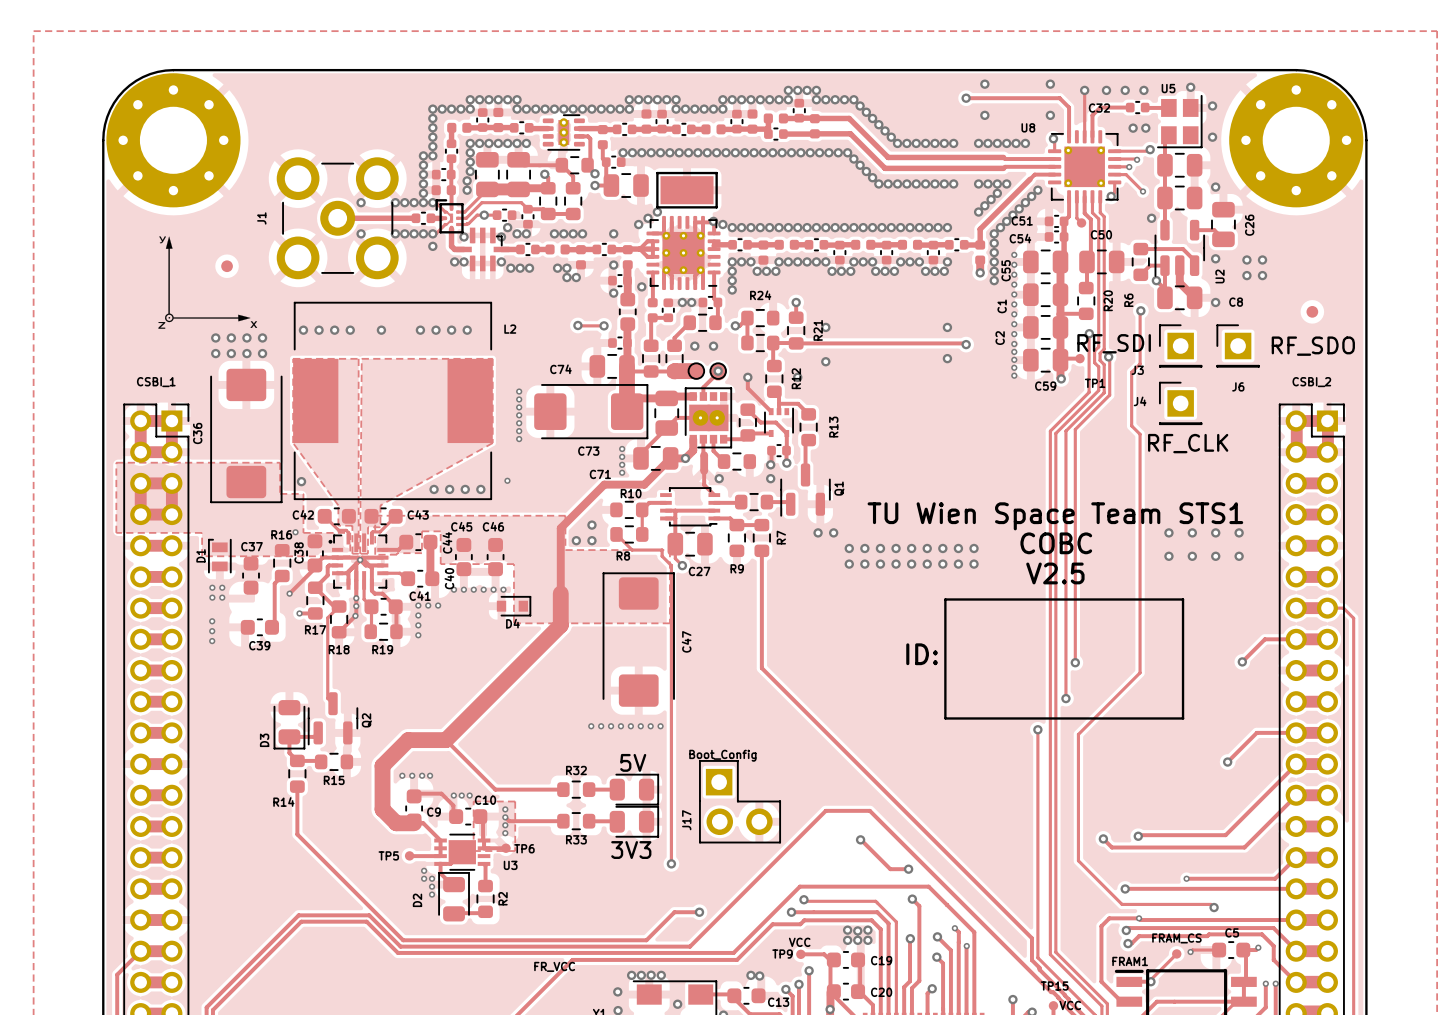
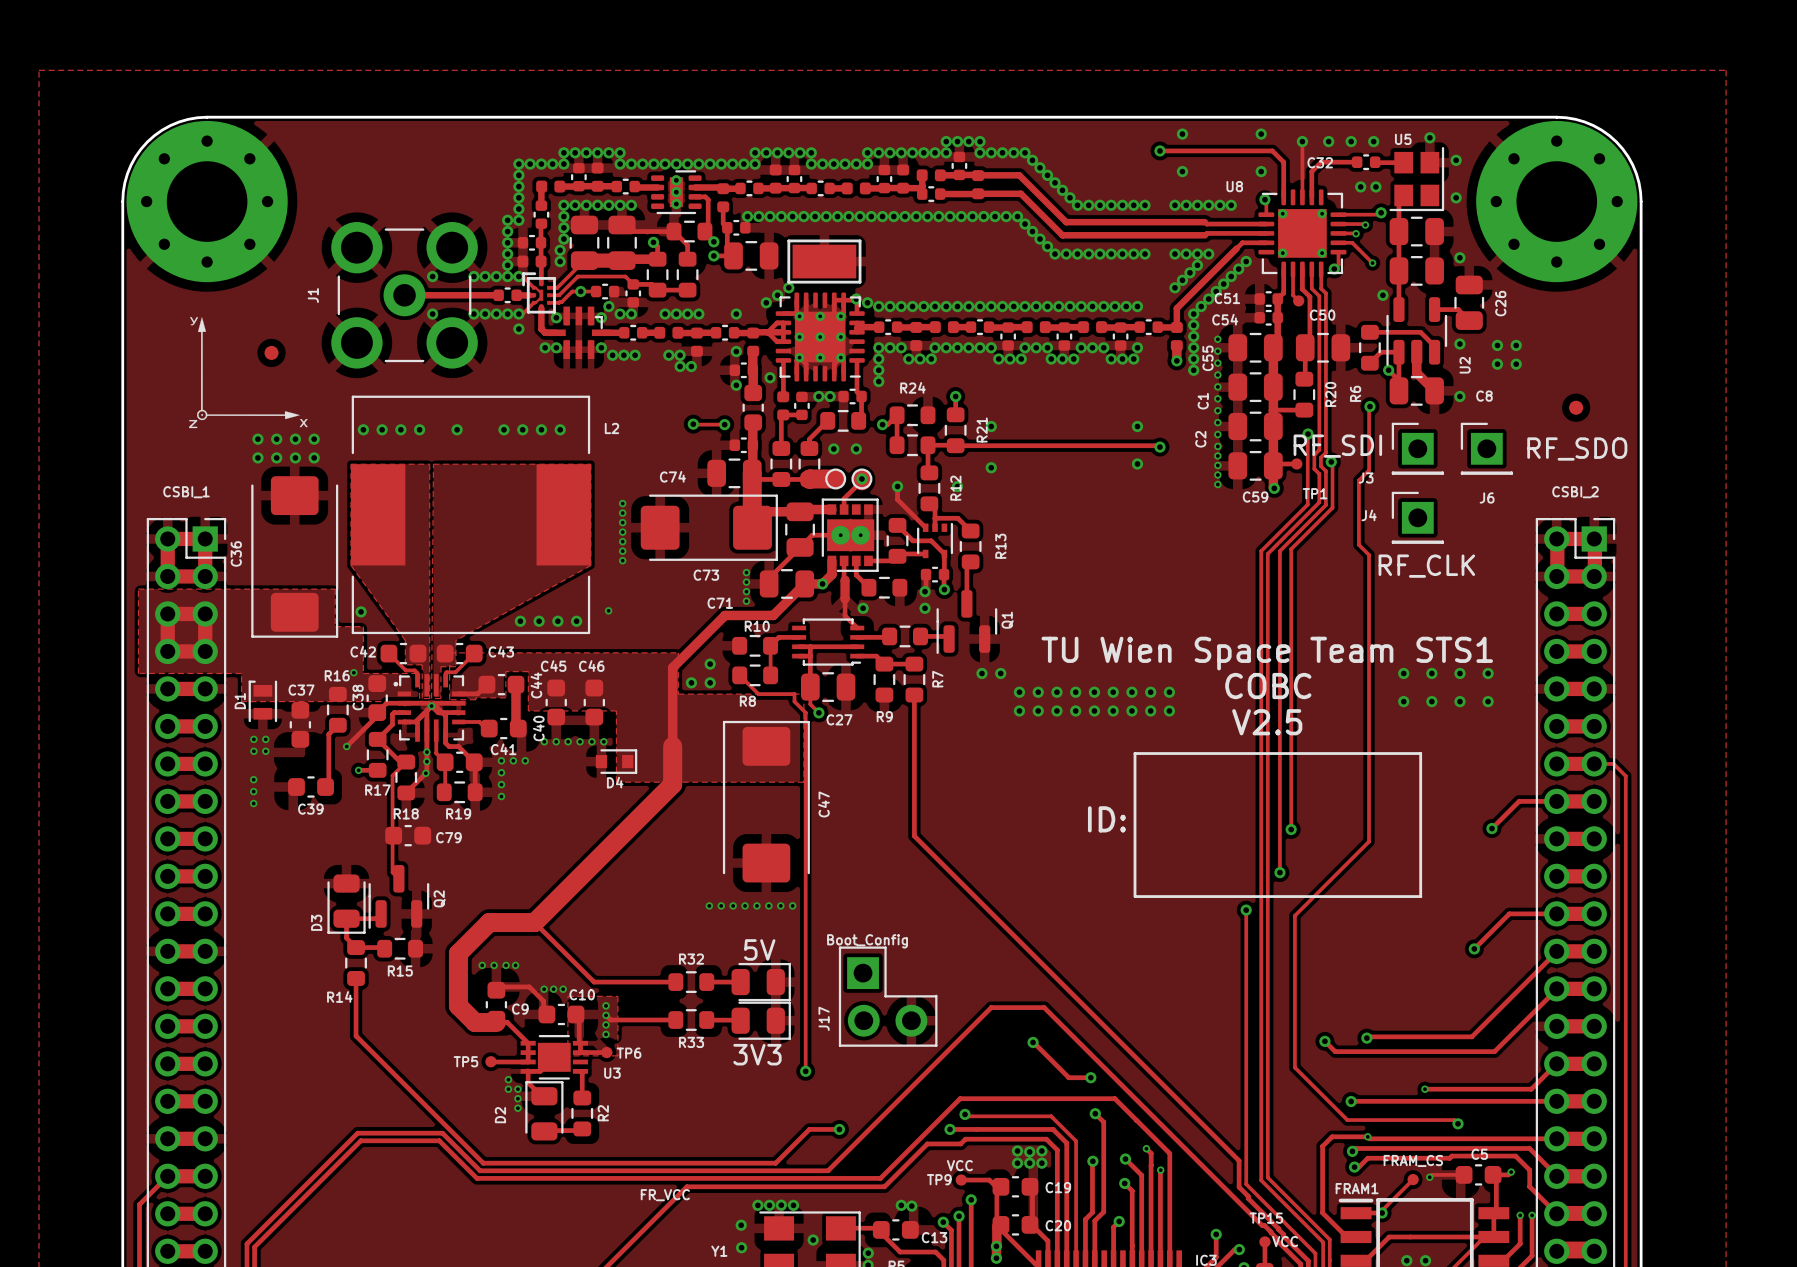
C79: none -> (408, 835)

